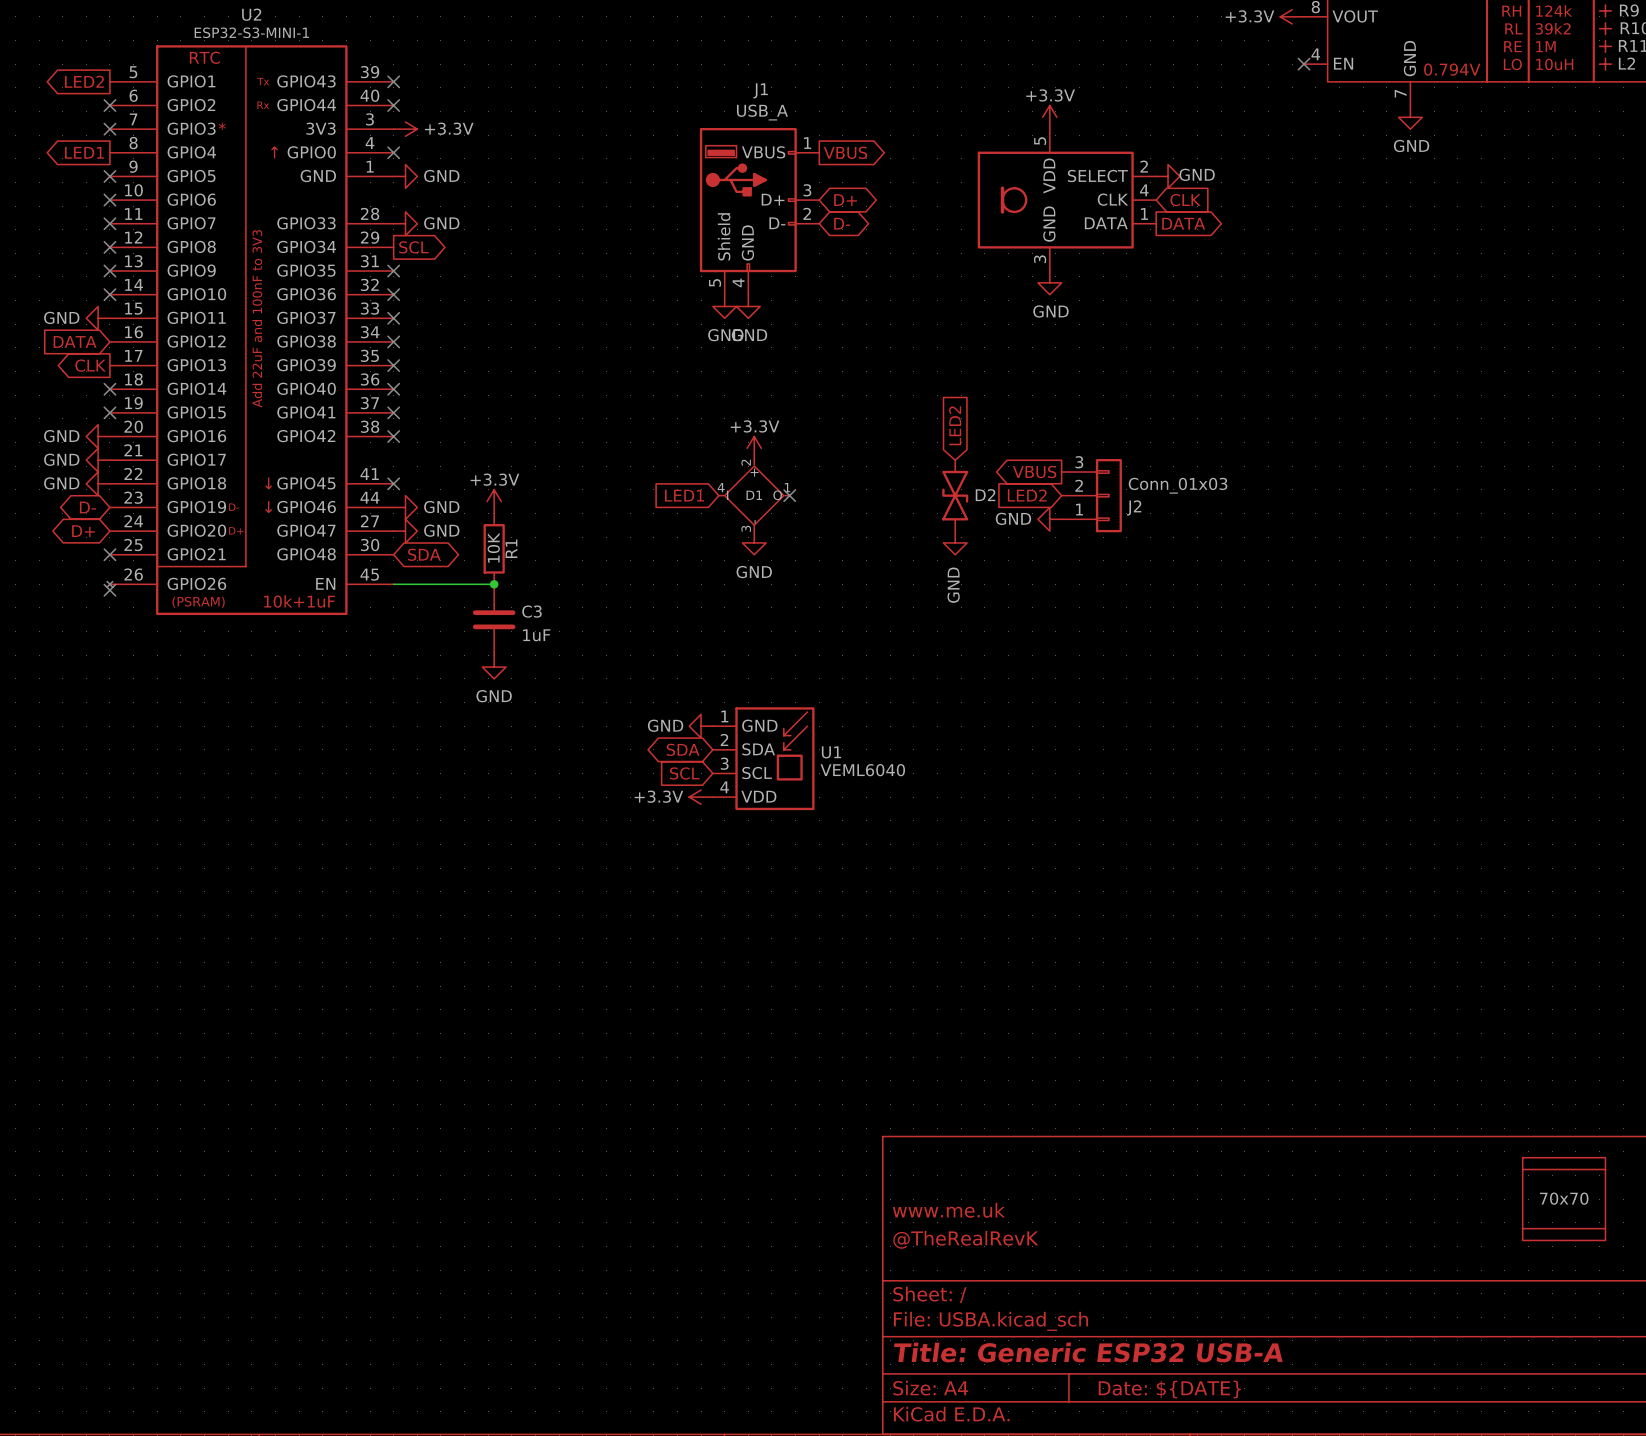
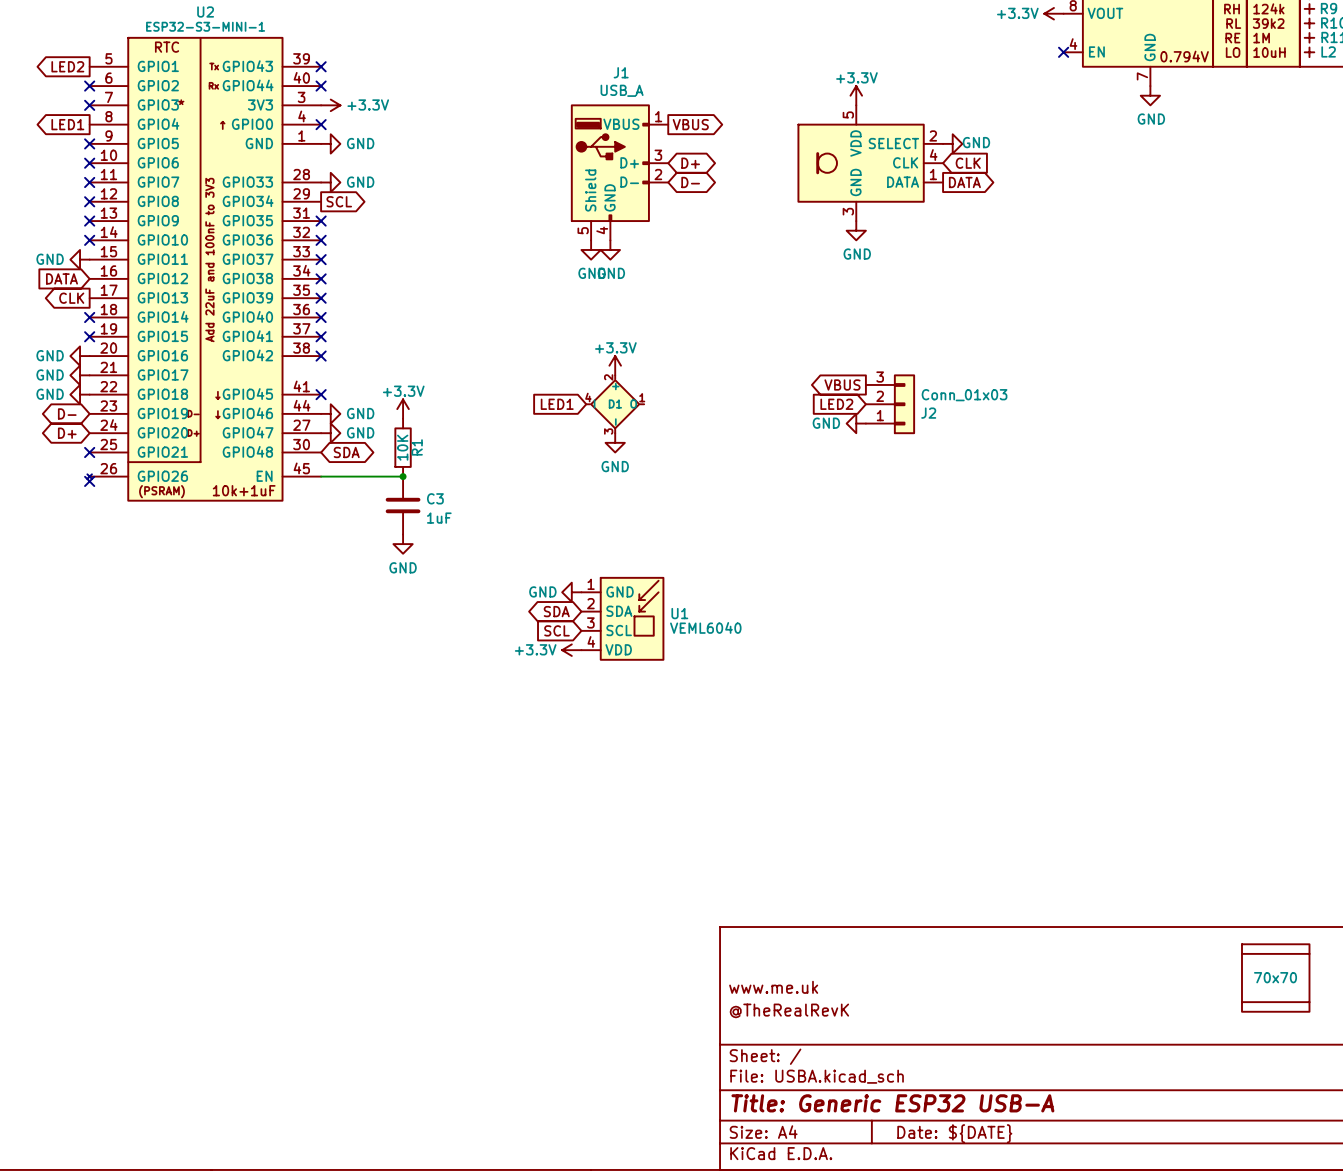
global label: LED2 (955, 425) -> none
no-connect mark: (789, 495) -> none
D2: (955, 495) -> none
power symbol: GND (955, 542) -> none

